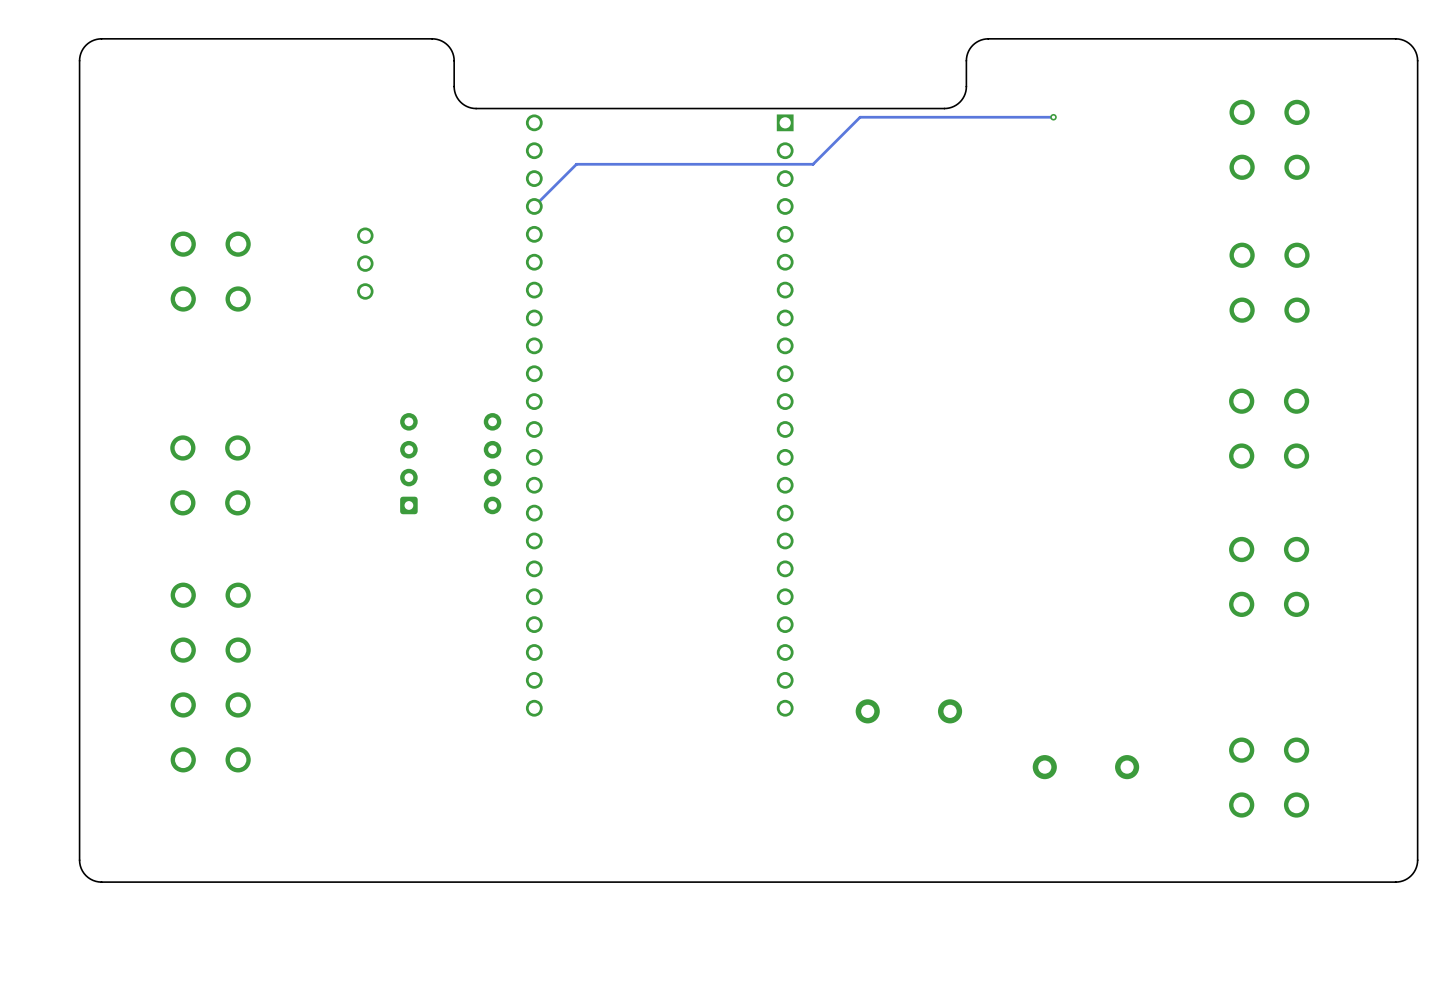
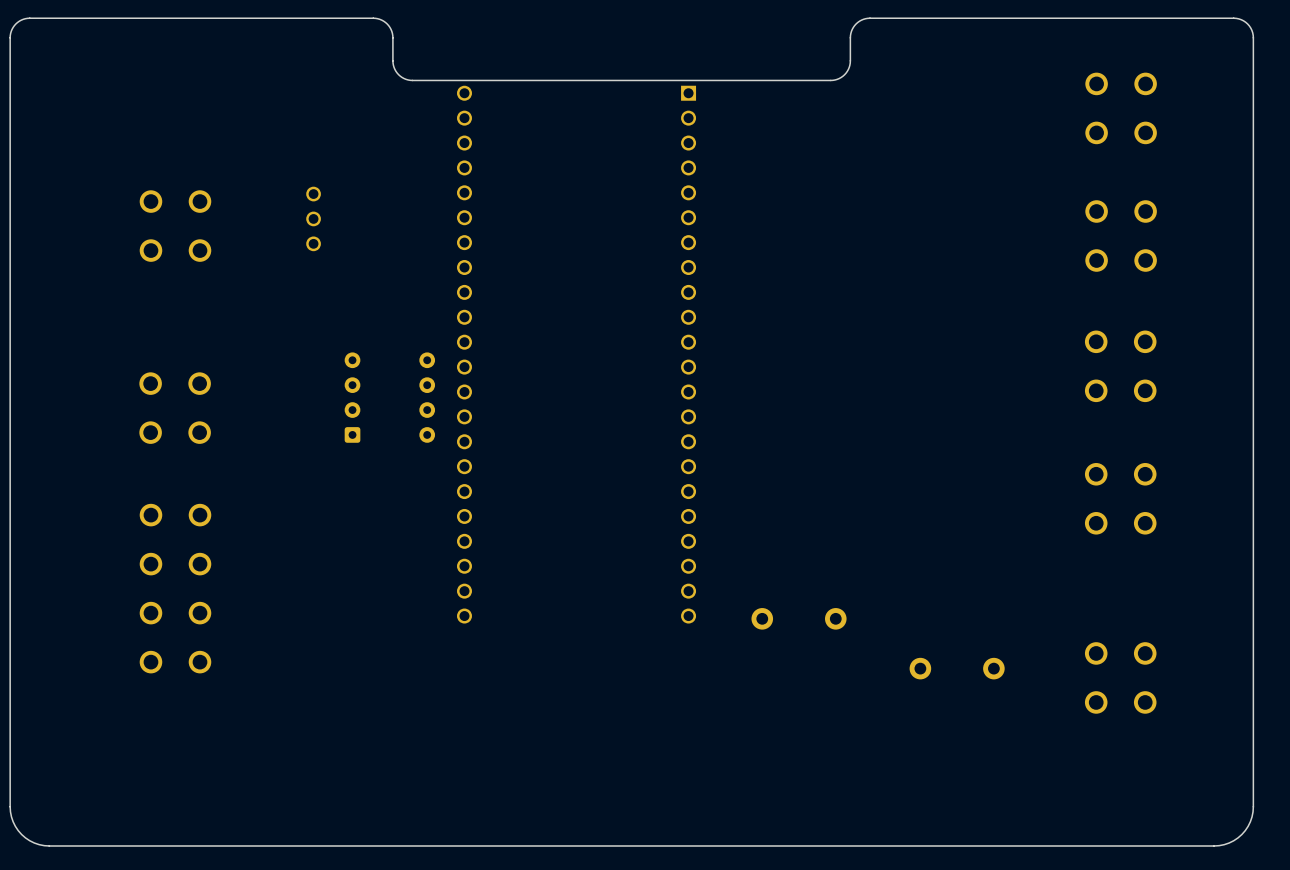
board edge: (101, 38) (92, 41) (86, 45) (81, 51) (79, 60) (79, 860) (82, 871) (90, 879) (101, 882) (1395, 882) (1405, 879) (1411, 875) (1416, 867) (1417, 860) -> (77, 18) (25, 18) (15, 23) (10, 35) (10, 806) (15, 826) (29, 840) (49, 845) (1219, 845) (1238, 837) (1250, 821) (1253, 806) (1253, 751)
track: (1053, 117) (860, 117) (813, 164) (576, 164) (534, 206) -> none
via: (1053, 117) -> none

